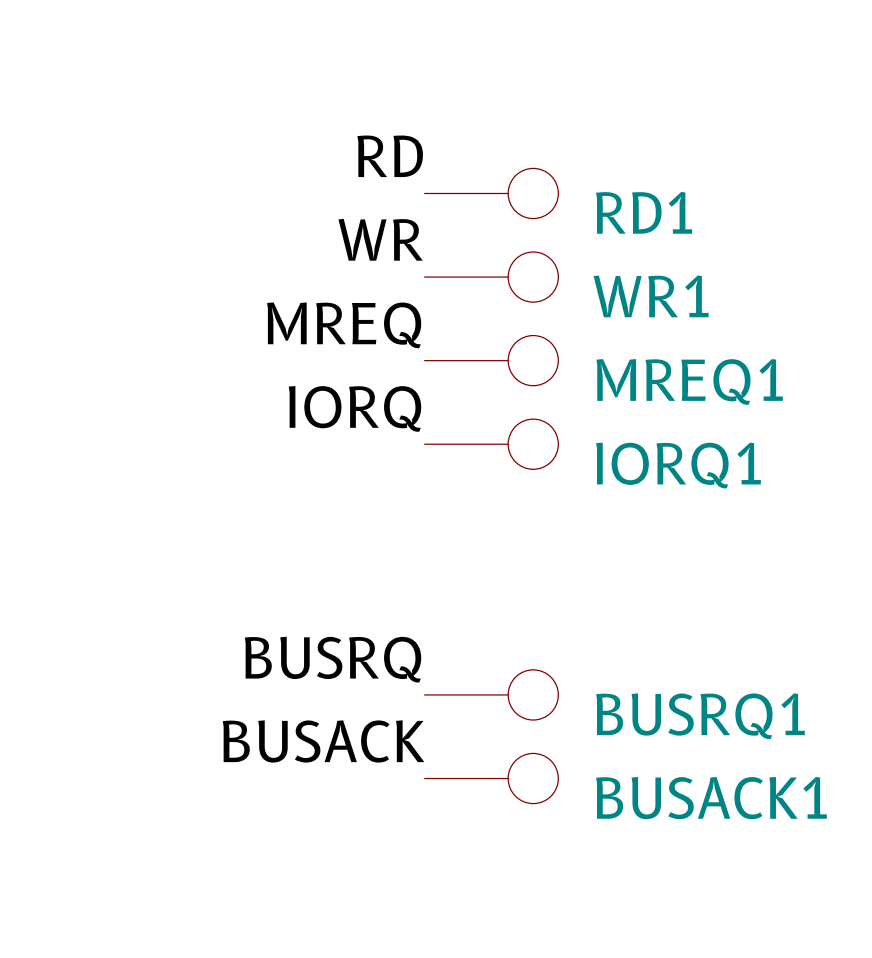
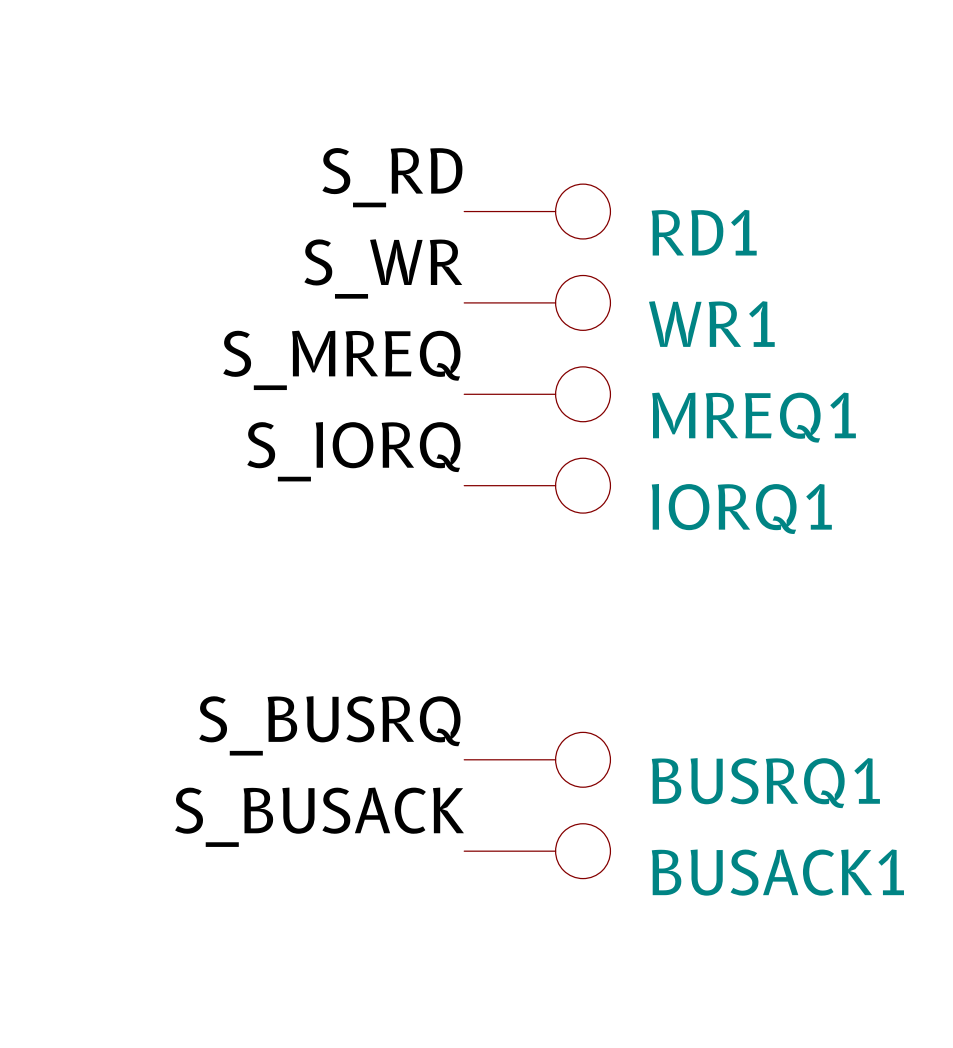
label: RD (390, 156) -> S_RD (392, 177)
label: WR (380, 239) -> S_WR (383, 268)
label: MREQ (344, 325) -> S_MREQ (341, 360)
label: IORQ (354, 408) -> S_IORQ (353, 451)
label: BUSRQ (333, 659) -> S_BUSRQ (329, 725)
label: BUSACK (323, 741) -> S_BUSACK (319, 817)

